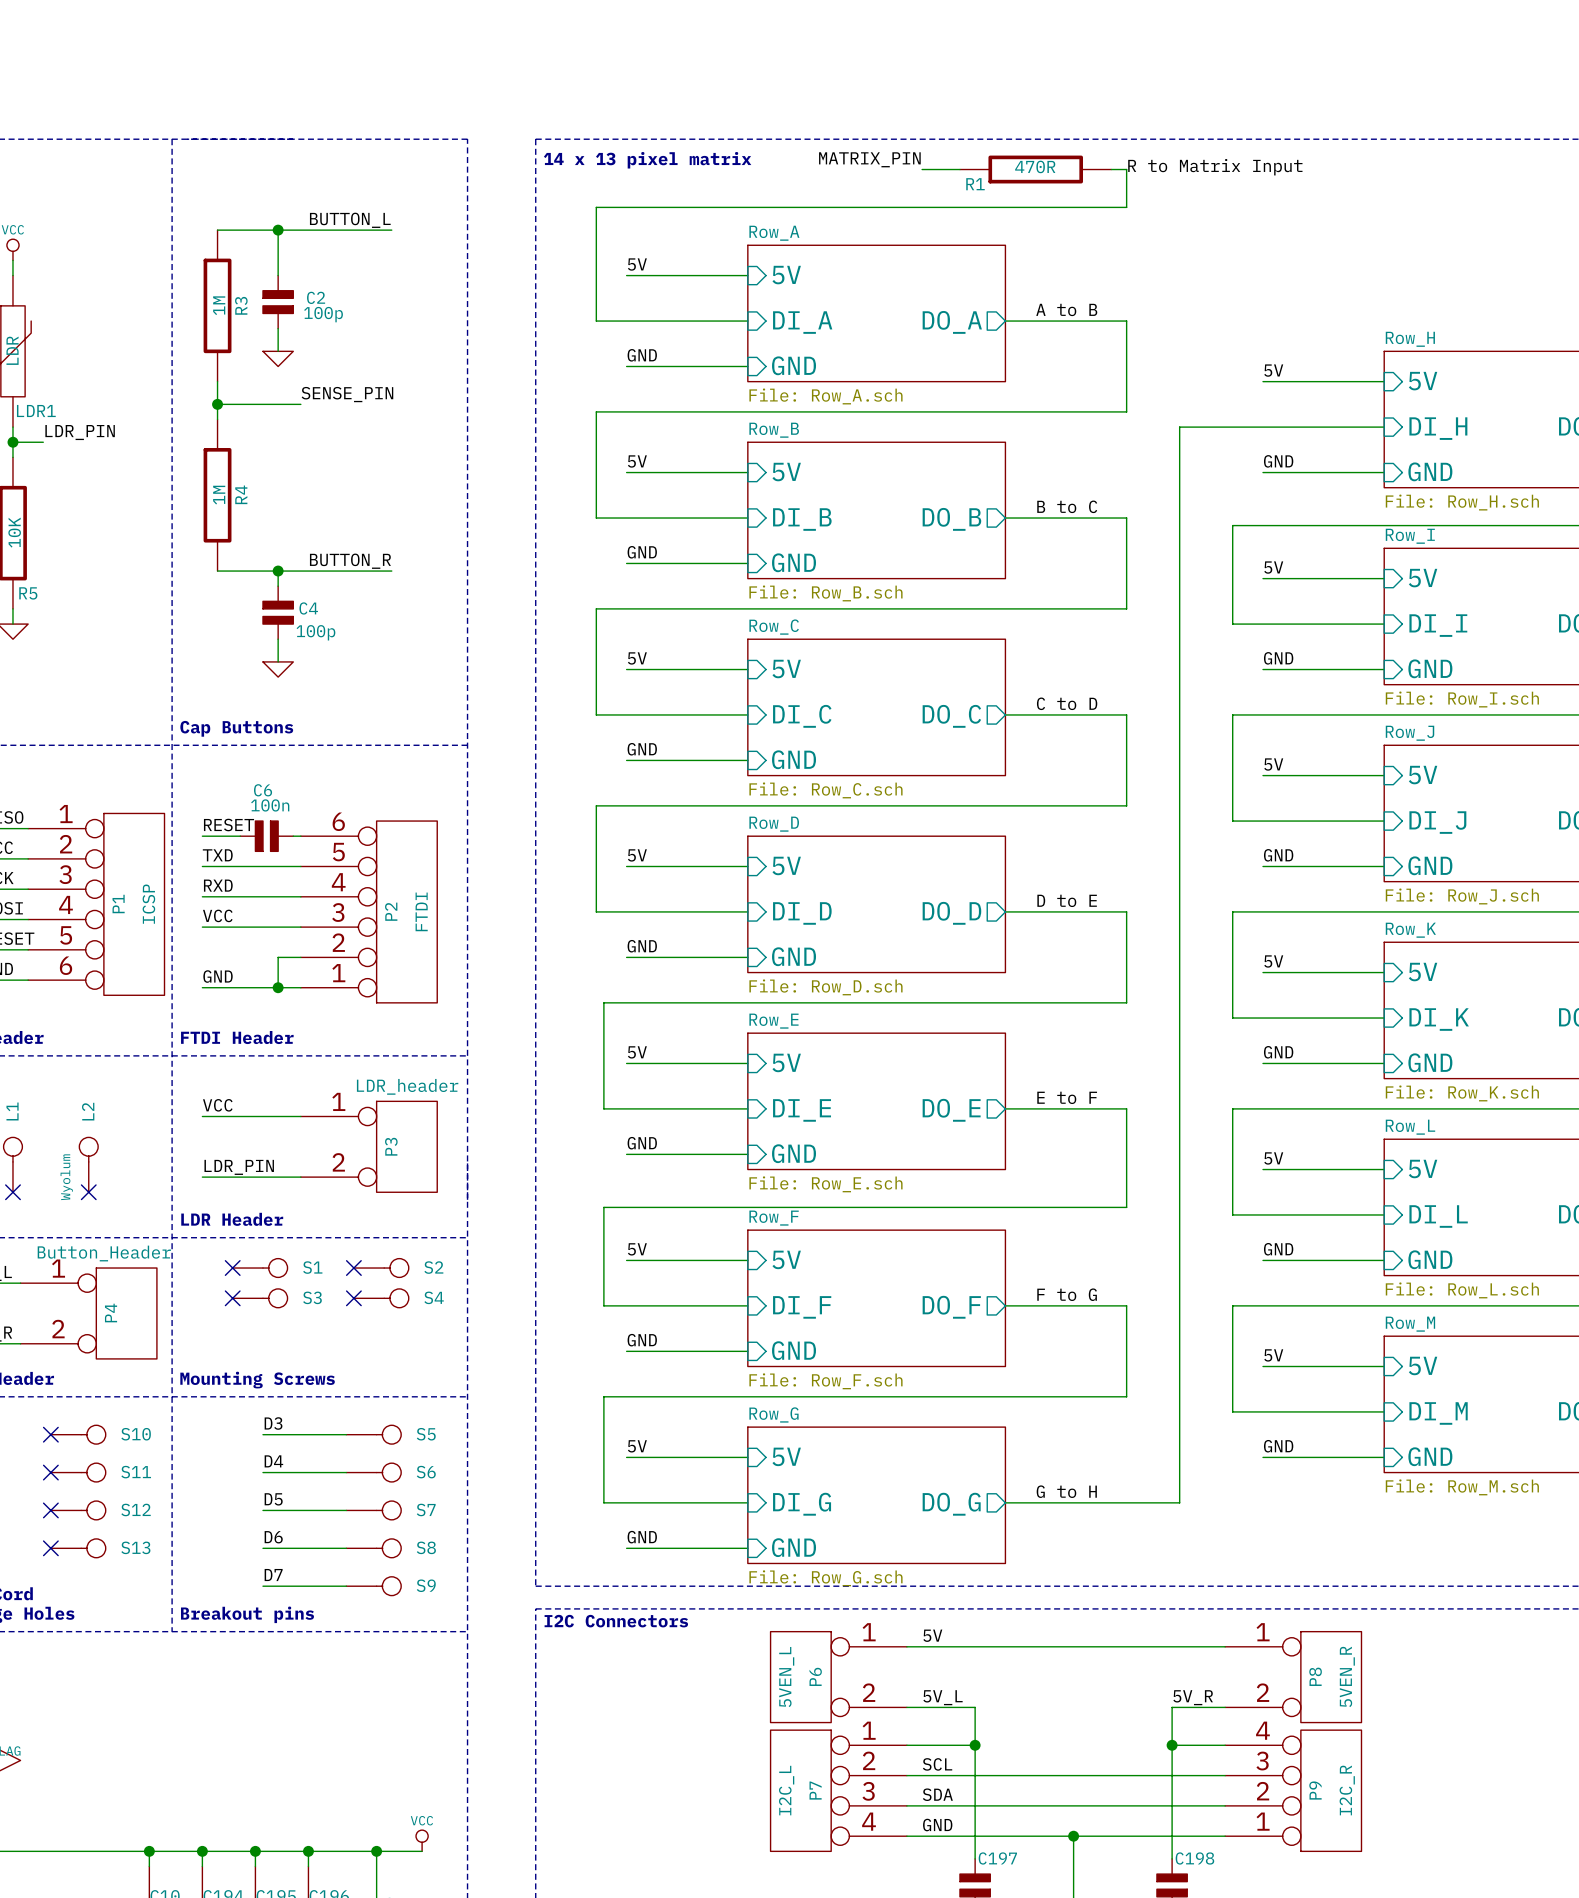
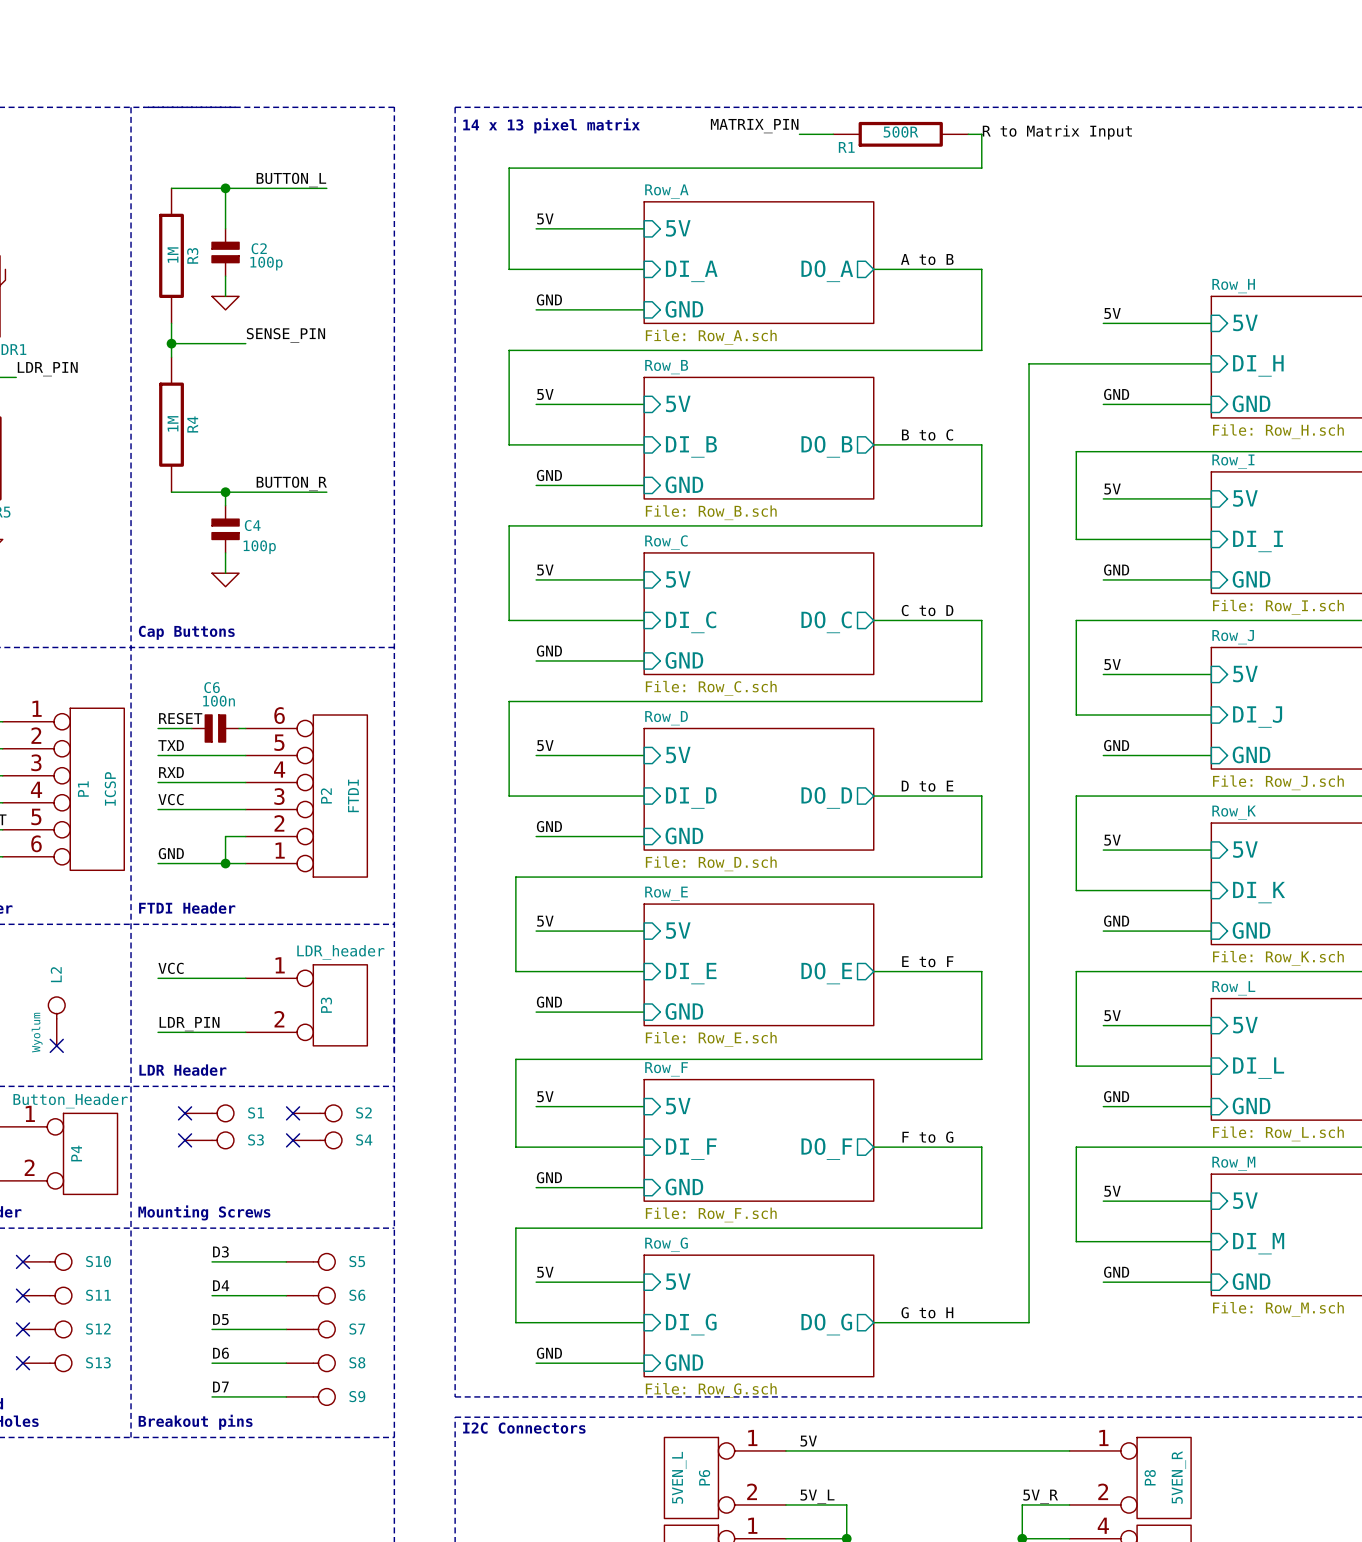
R1 value: 470R (1035, 166) -> 500R (900, 132)

